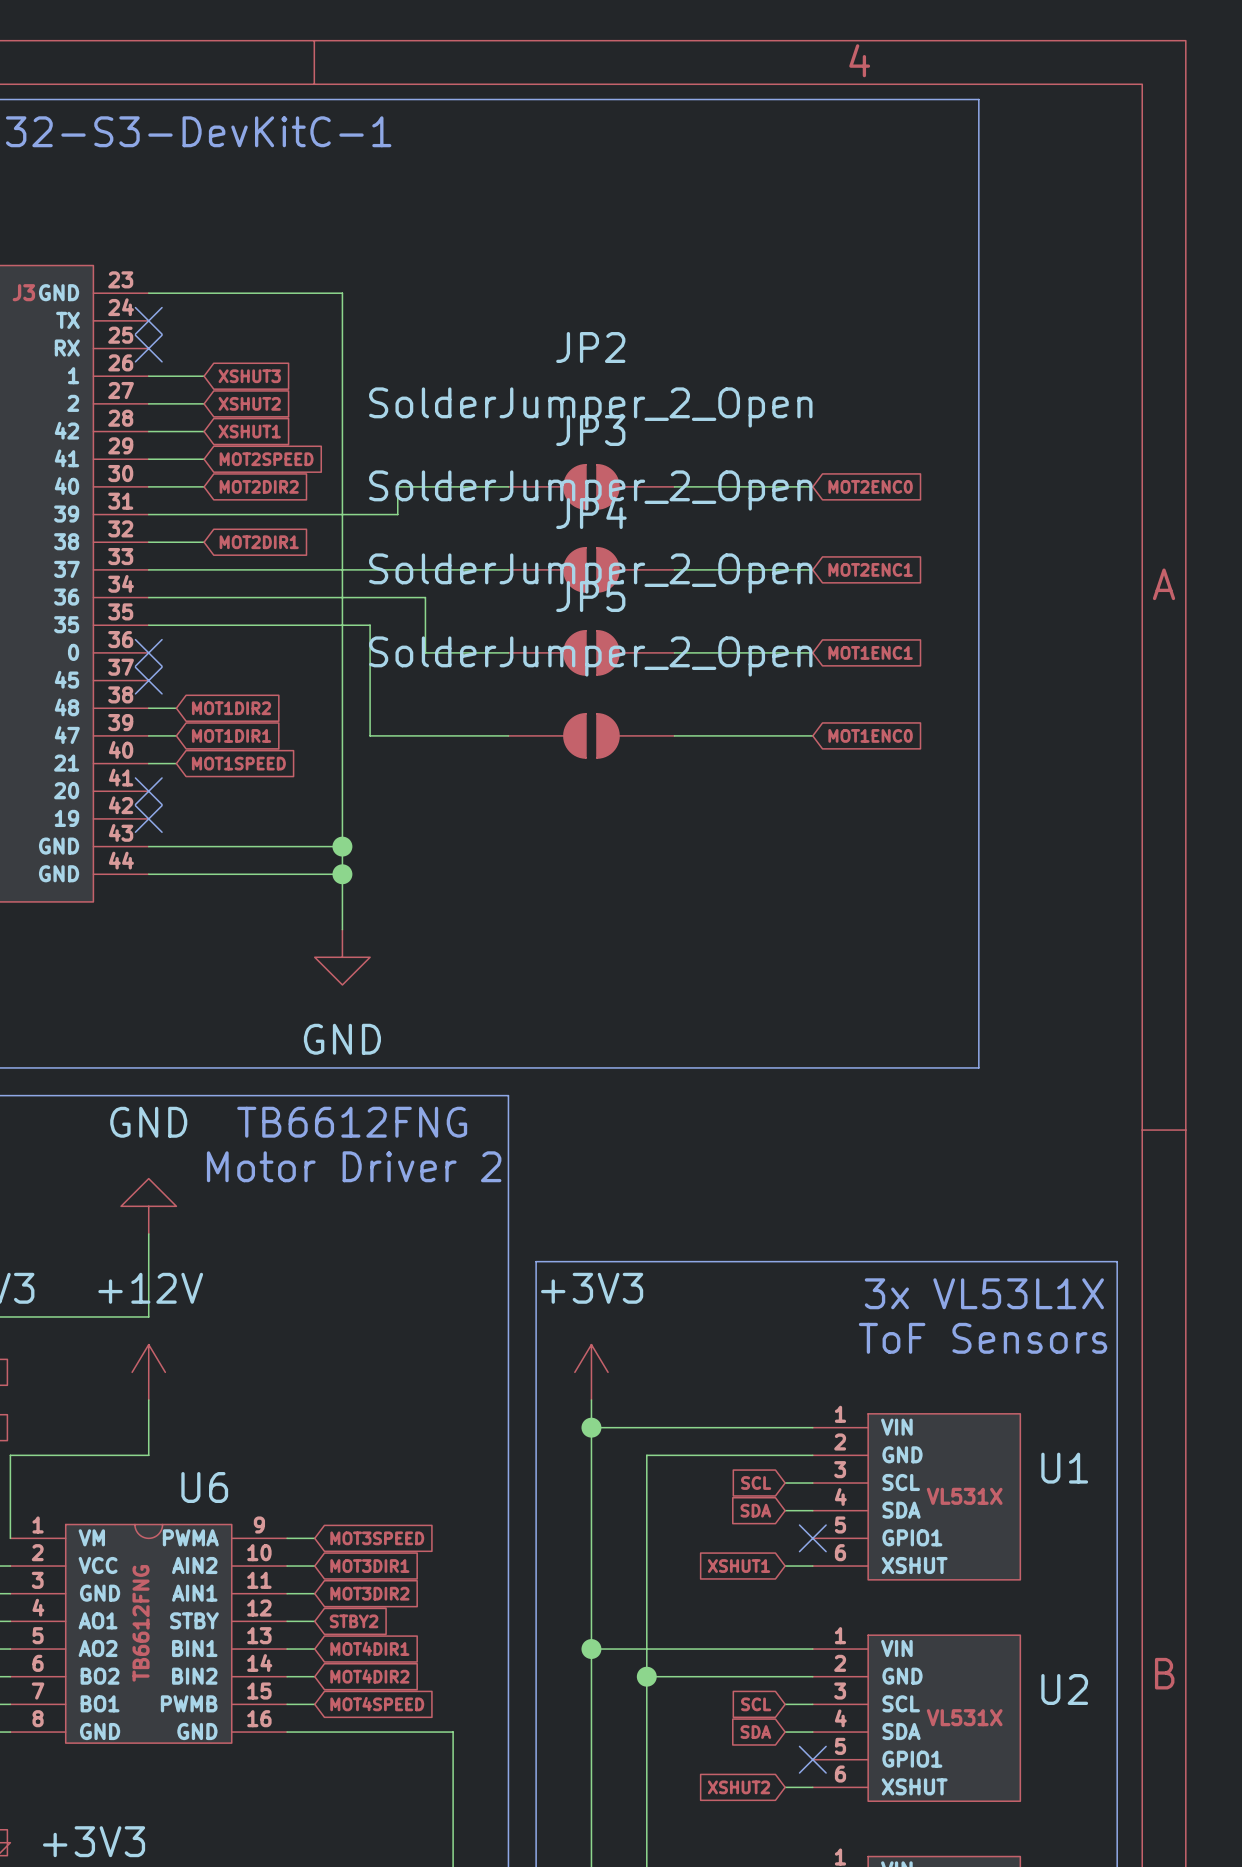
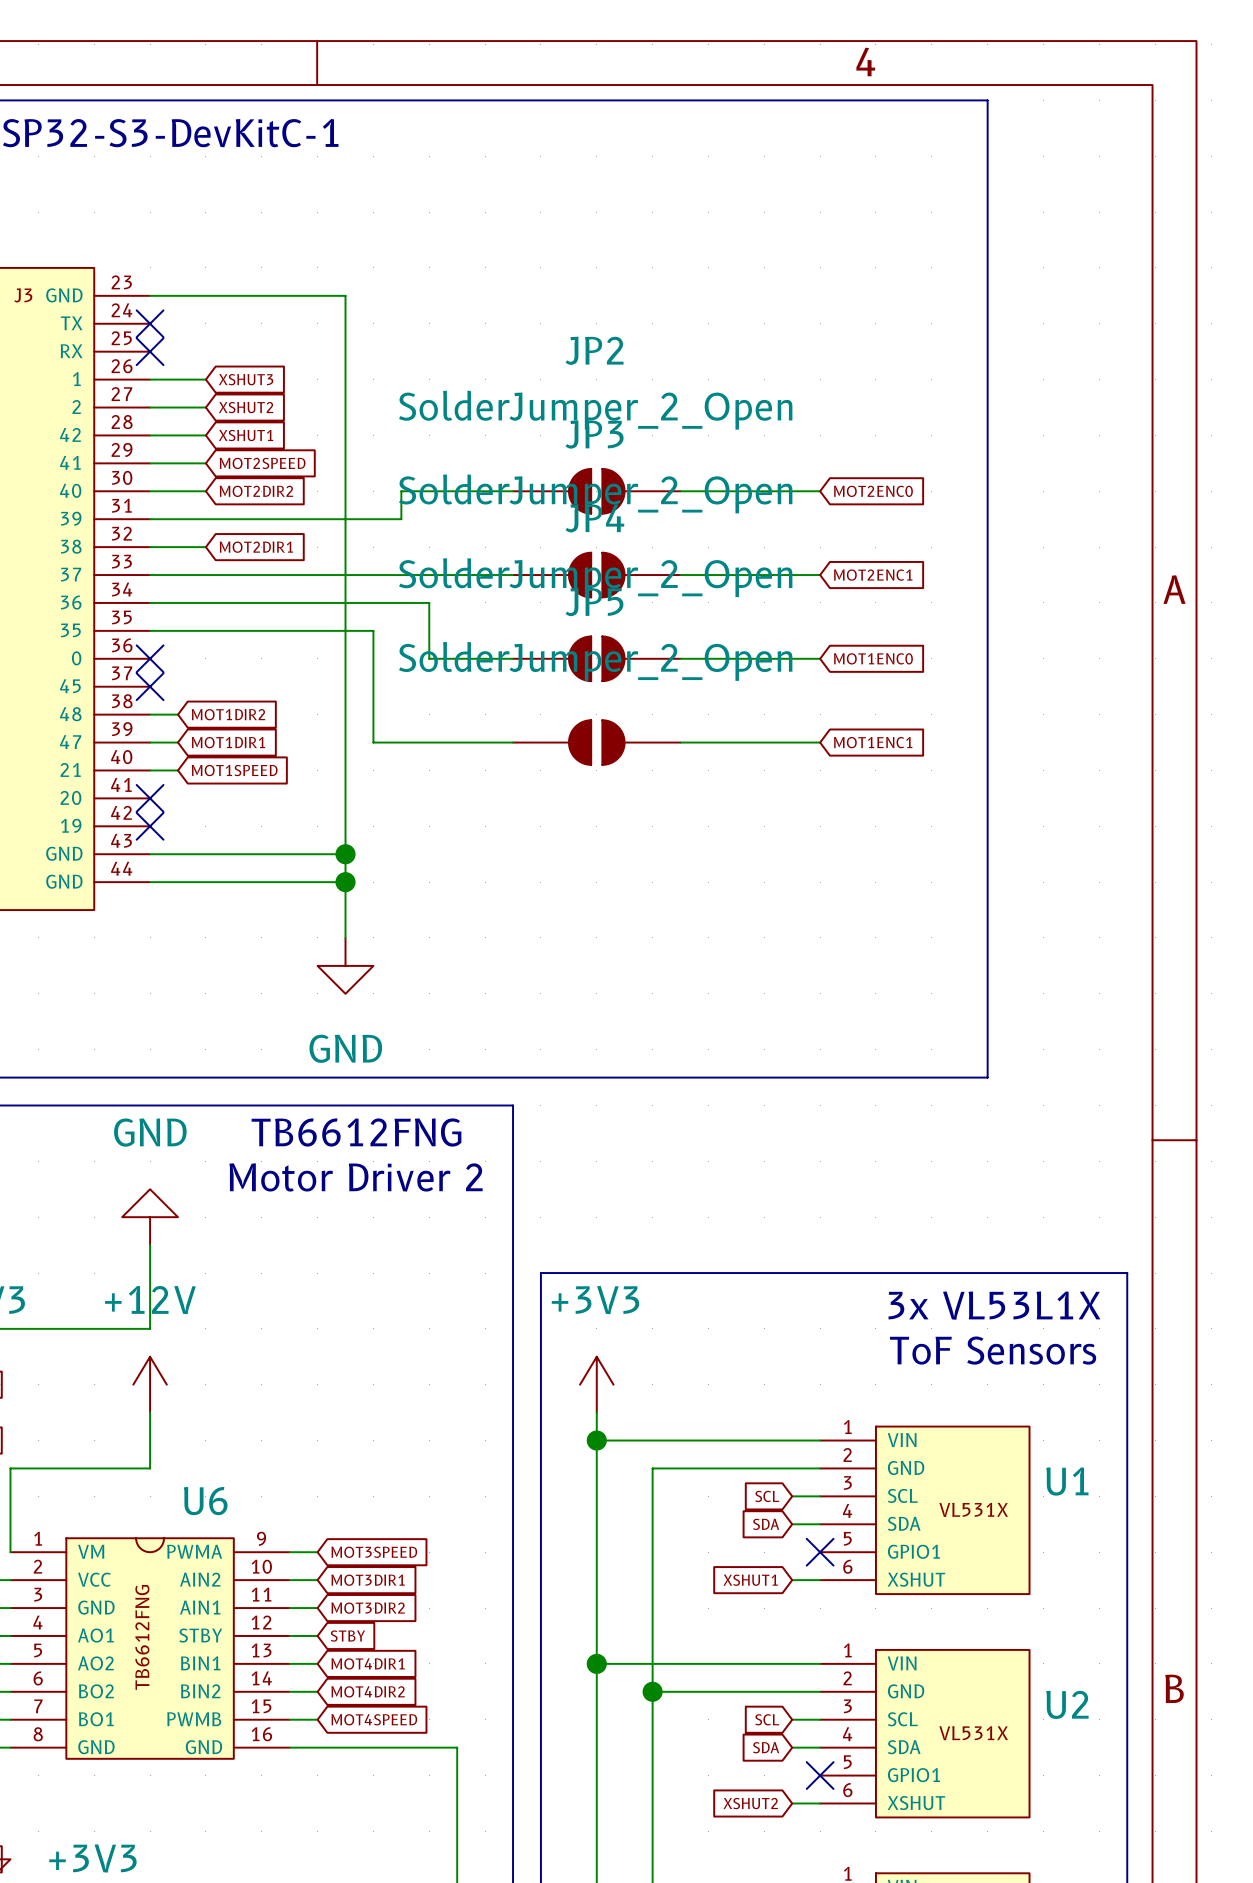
global label: MOT1ENC1 (870, 652) -> MOT1ENC0 (873, 658)
global label: MOT1ENC0 (870, 735) -> MOT1ENC1 (873, 742)
global label: STBY2 (354, 1621) -> STBY (347, 1636)

